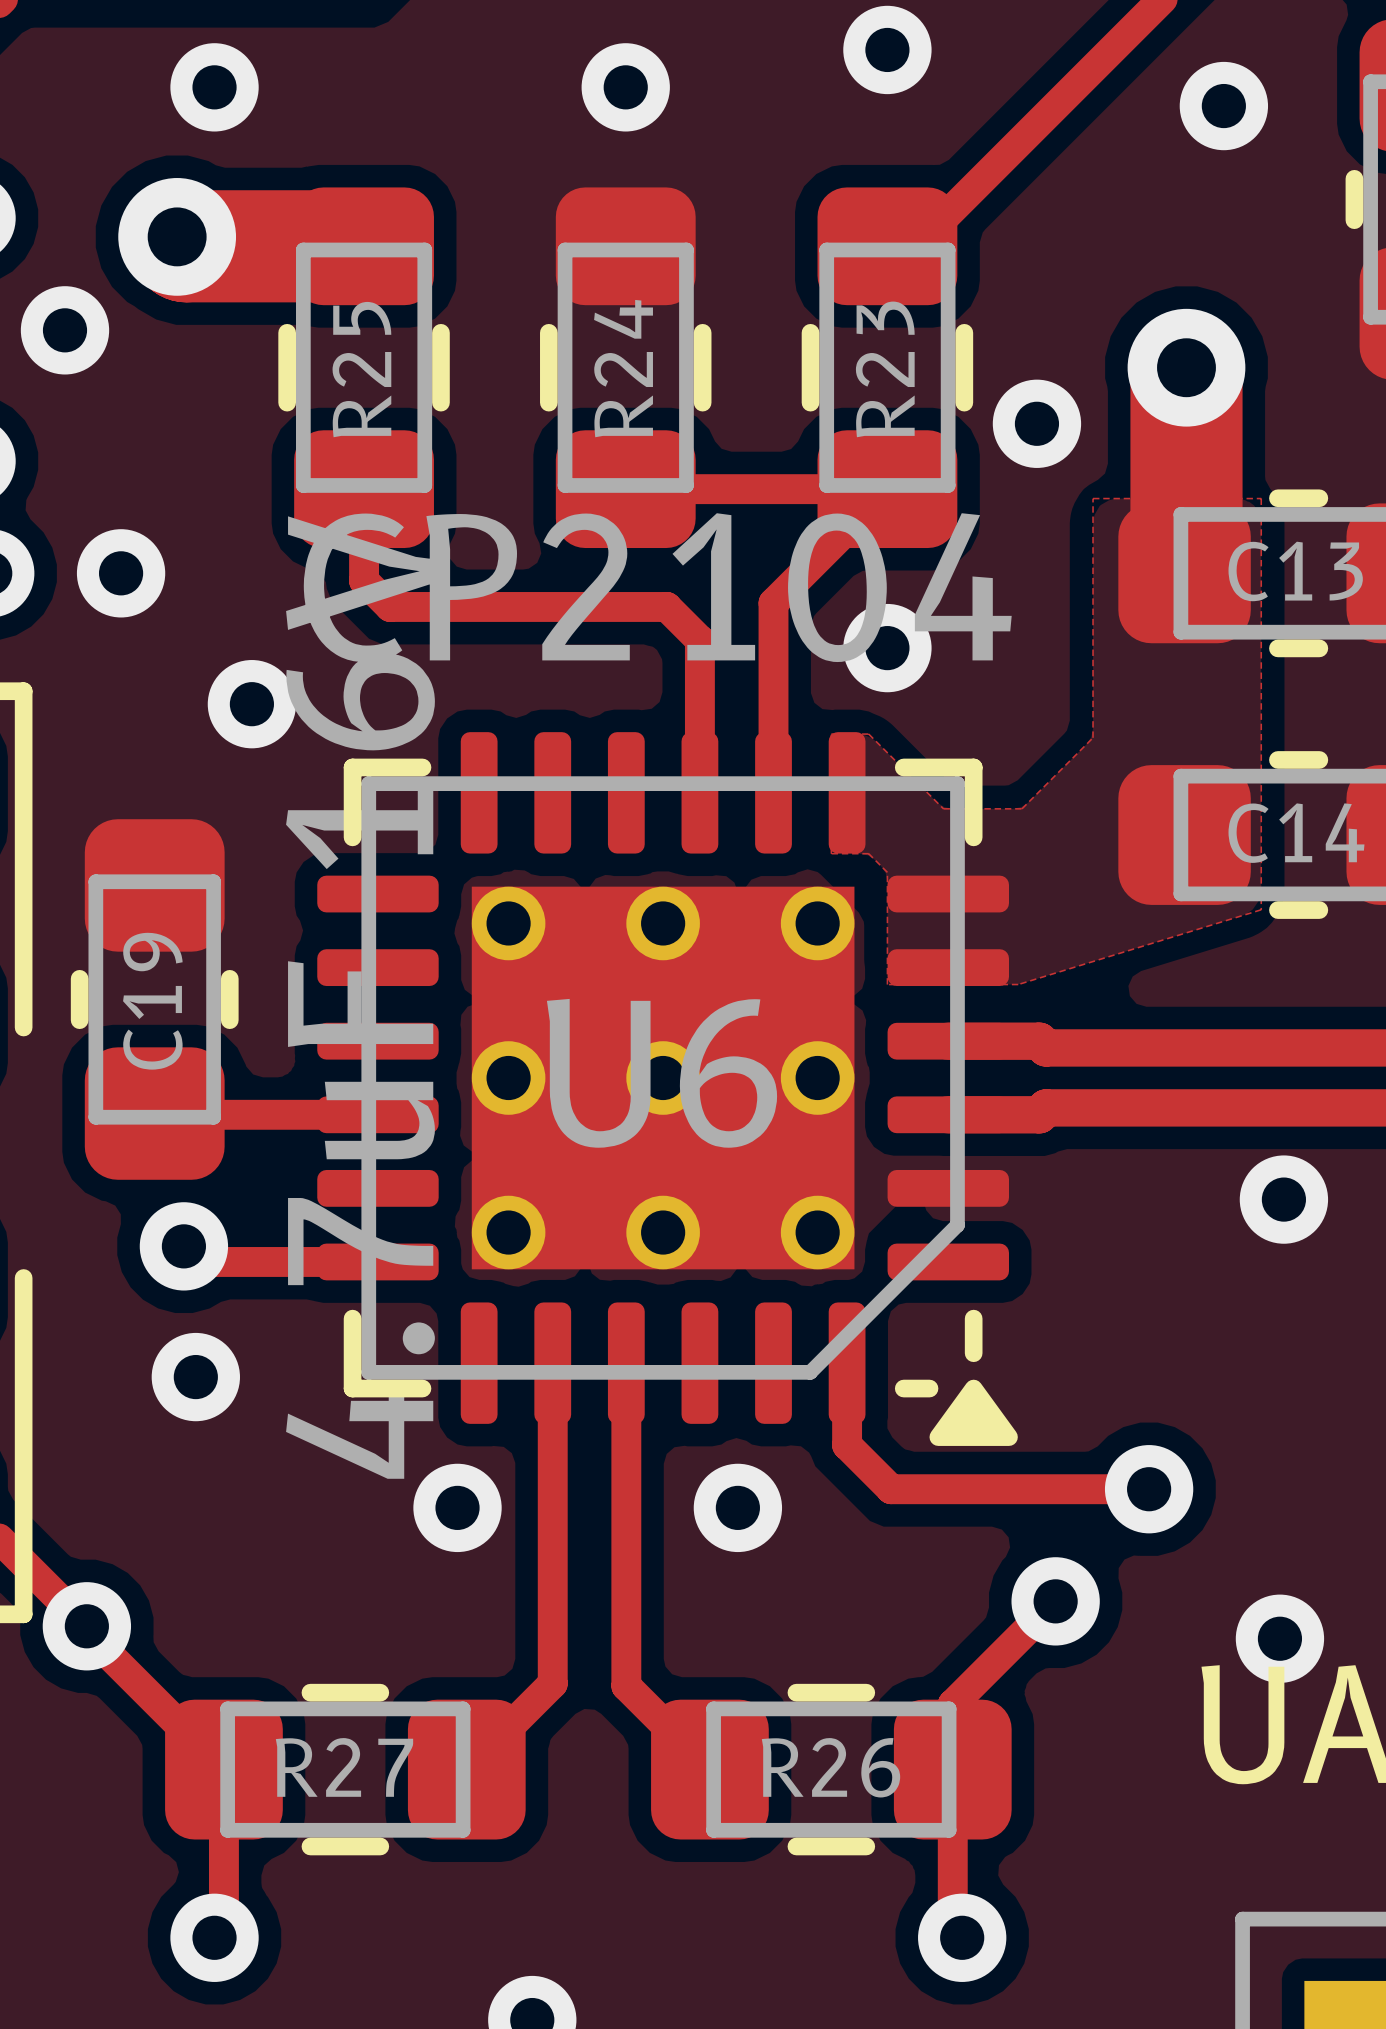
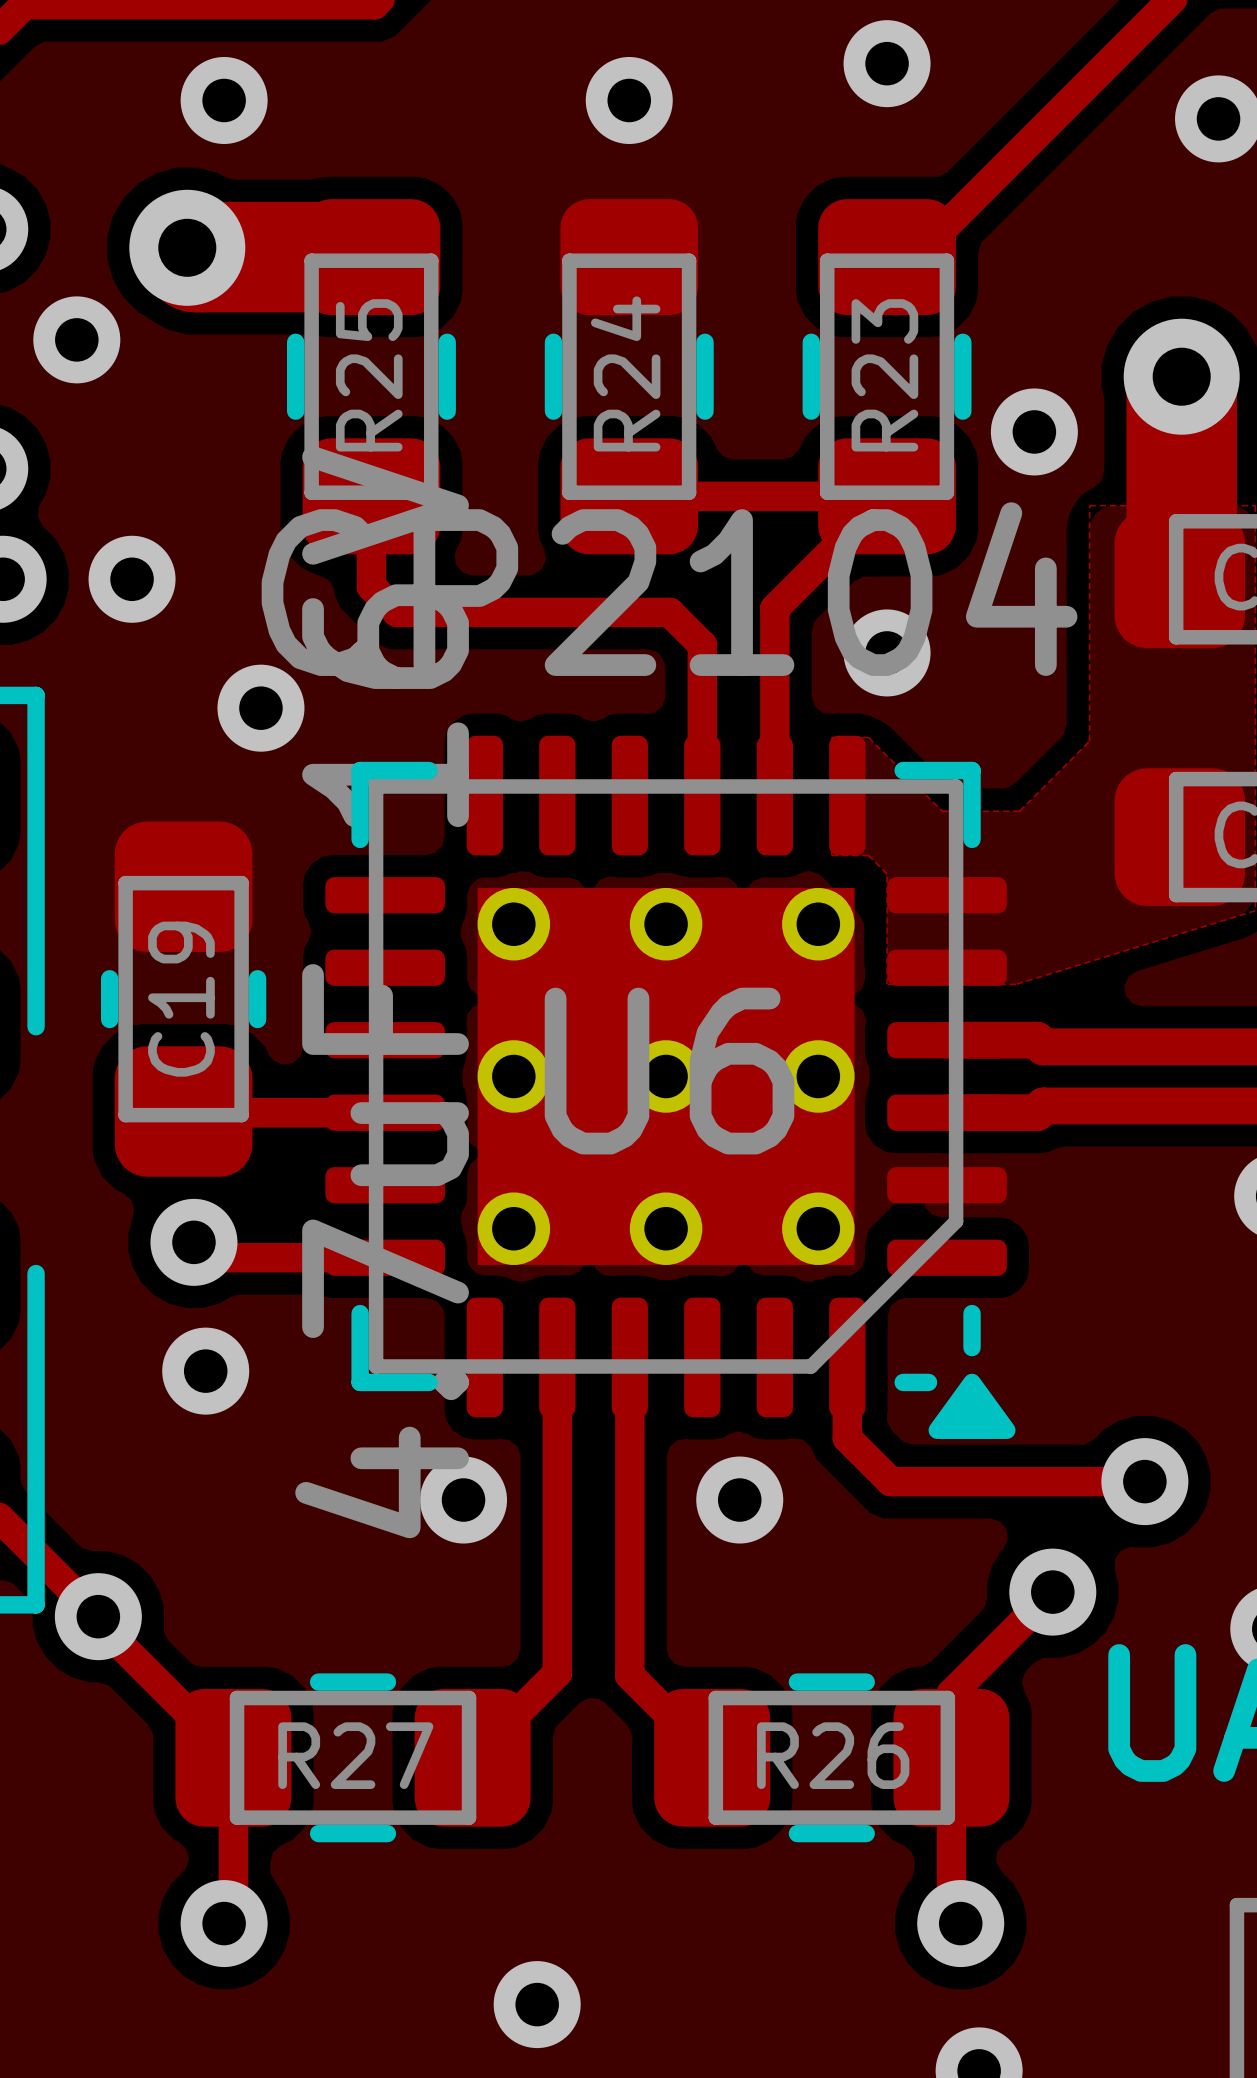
C19 position: (154, 999) -> (183, 999)

